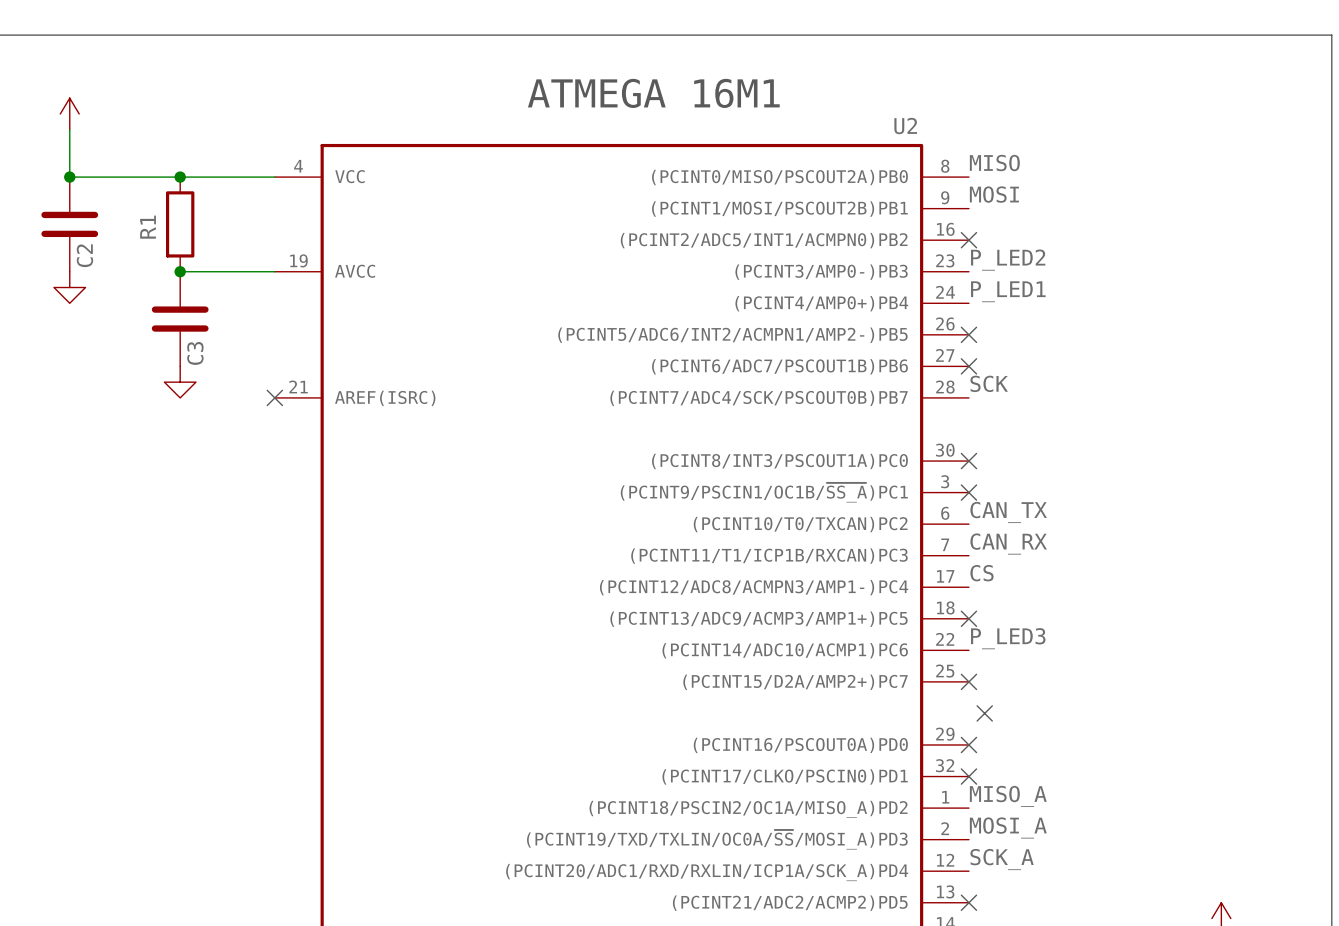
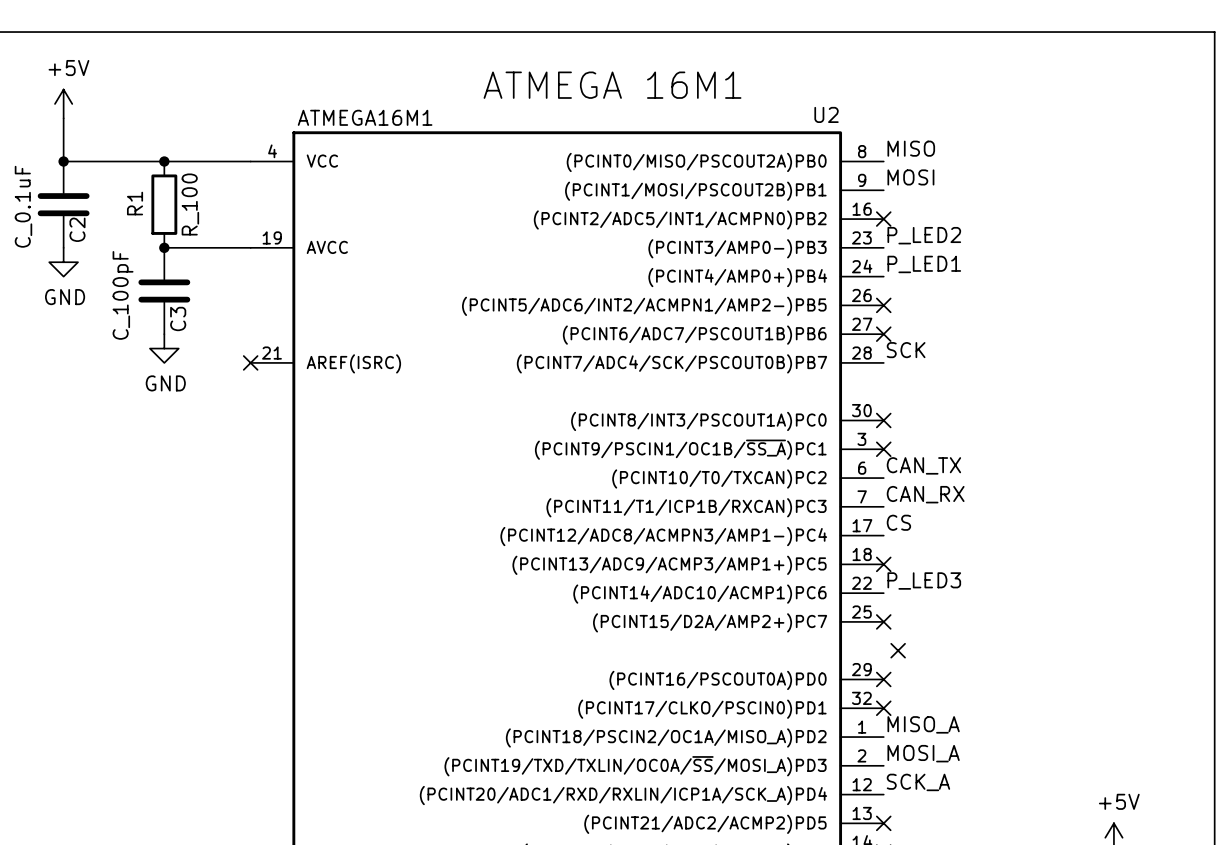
power symbol text: none -> +5V (68, 68)
U2 value: none -> ATMEGA16M1 (365, 117)
C2 value: none -> C_0.1uF (23, 206)
R1 value: none -> R_100 (190, 204)
power symbol text: none -> GND (65, 297)
C3 value: none -> C_100pF (123, 295)
power symbol text: none -> GND (165, 383)
power symbol text: none -> +5V (1119, 801)

